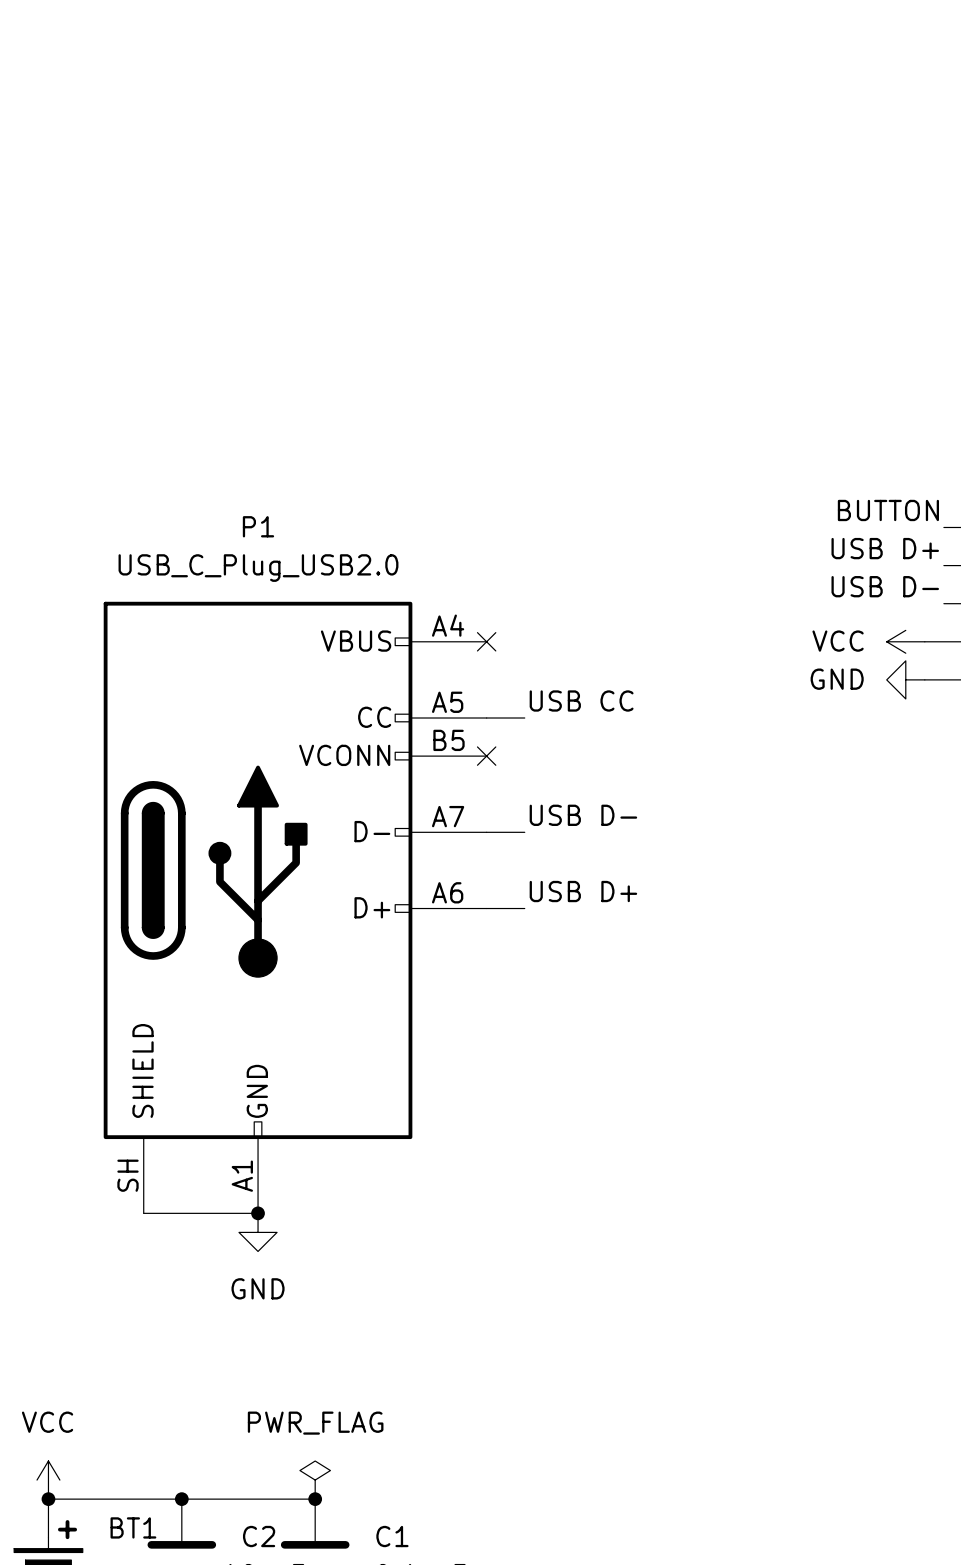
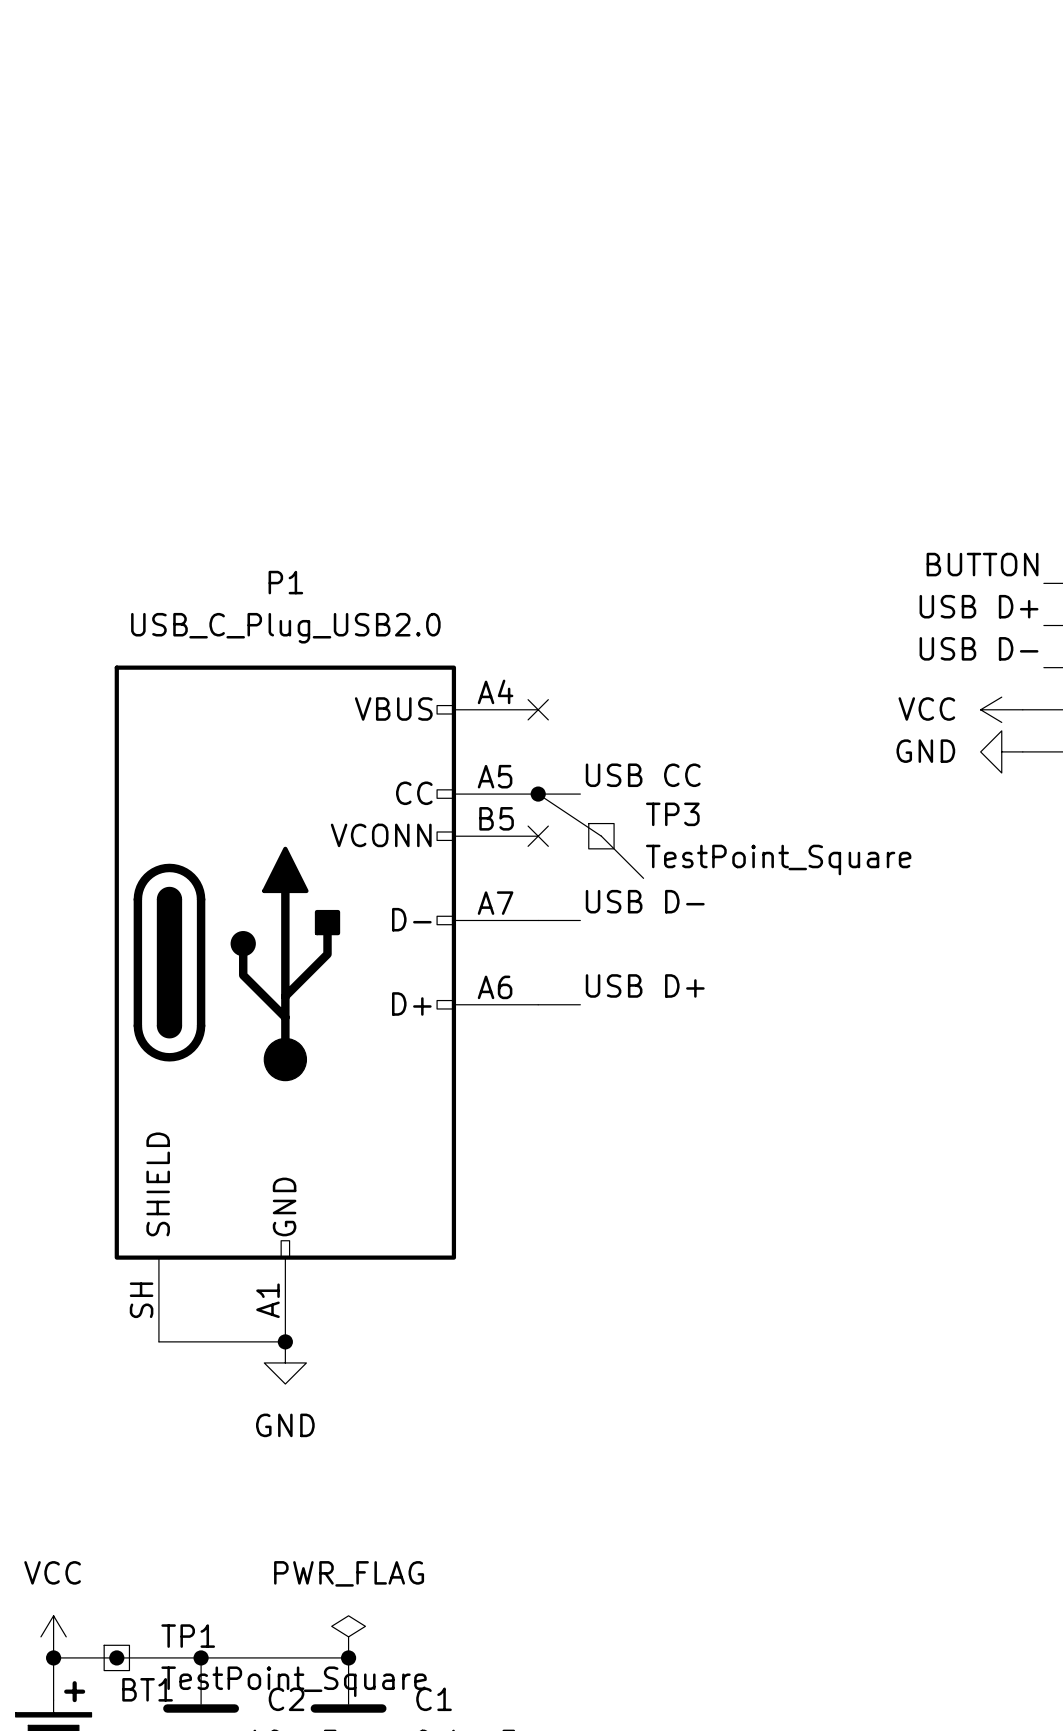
wire: none -> (538, 794) (601, 836) (643, 878)
junction: none -> (538, 794)
TP3: none -> TestPoint_Square (601, 836)
junction: none -> (116, 1657)
TP1: none -> TestPoint_Square (116, 1657)

